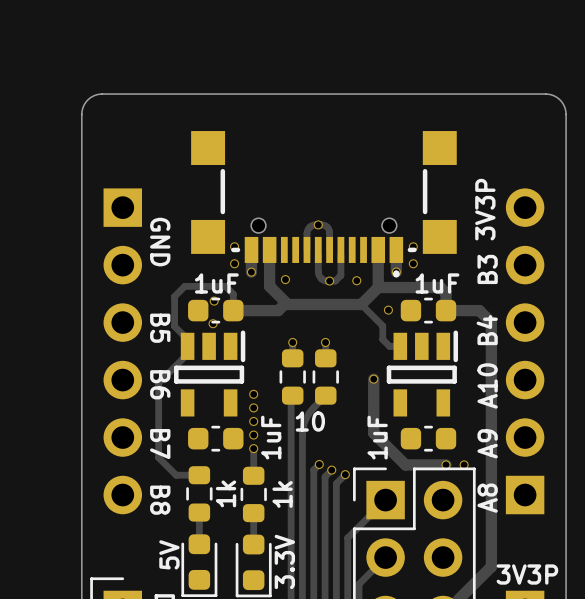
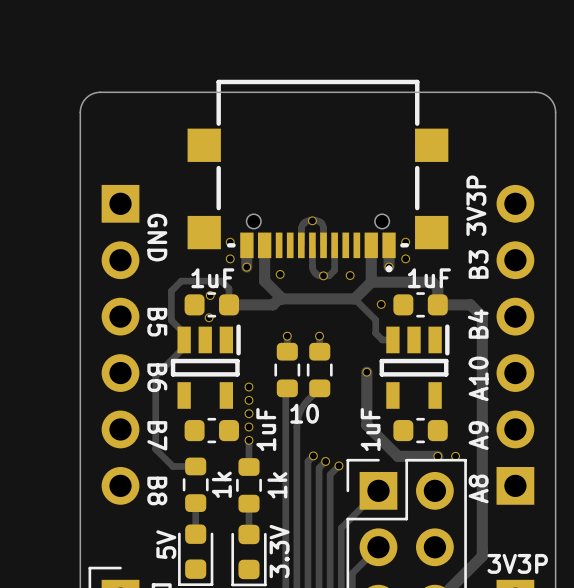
part: none -> (317, 175)

